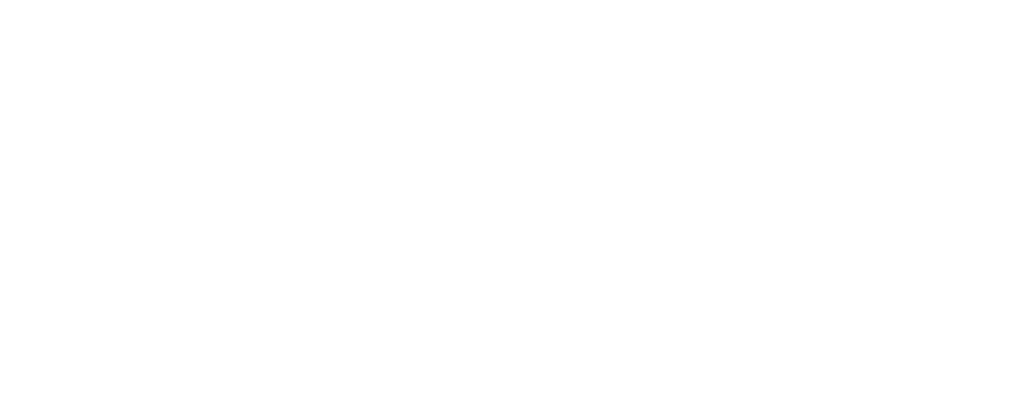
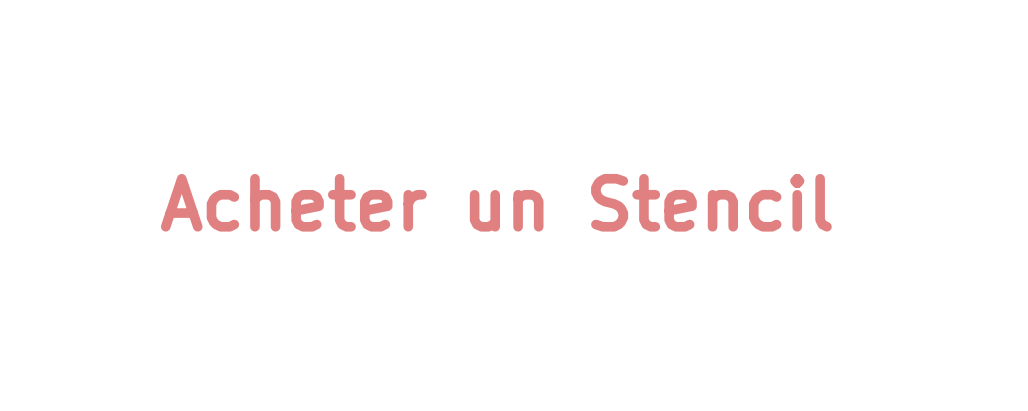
text: none -> Acheter un Stencil (496, 202)

